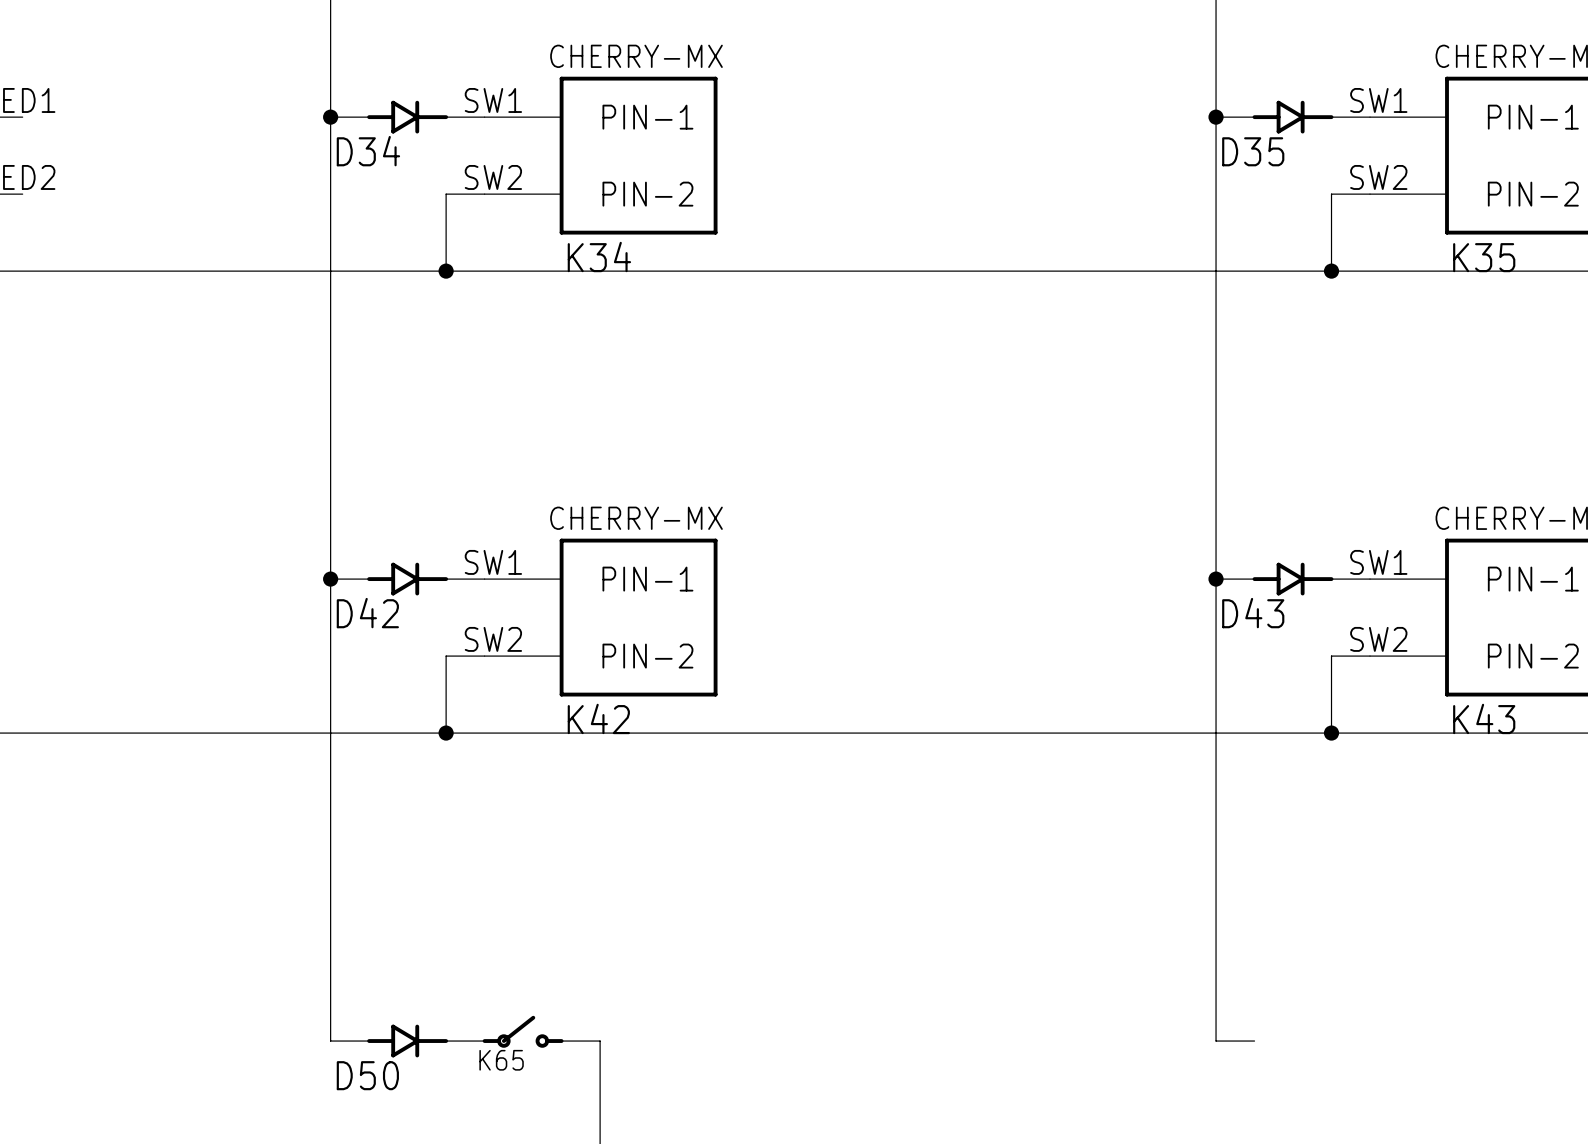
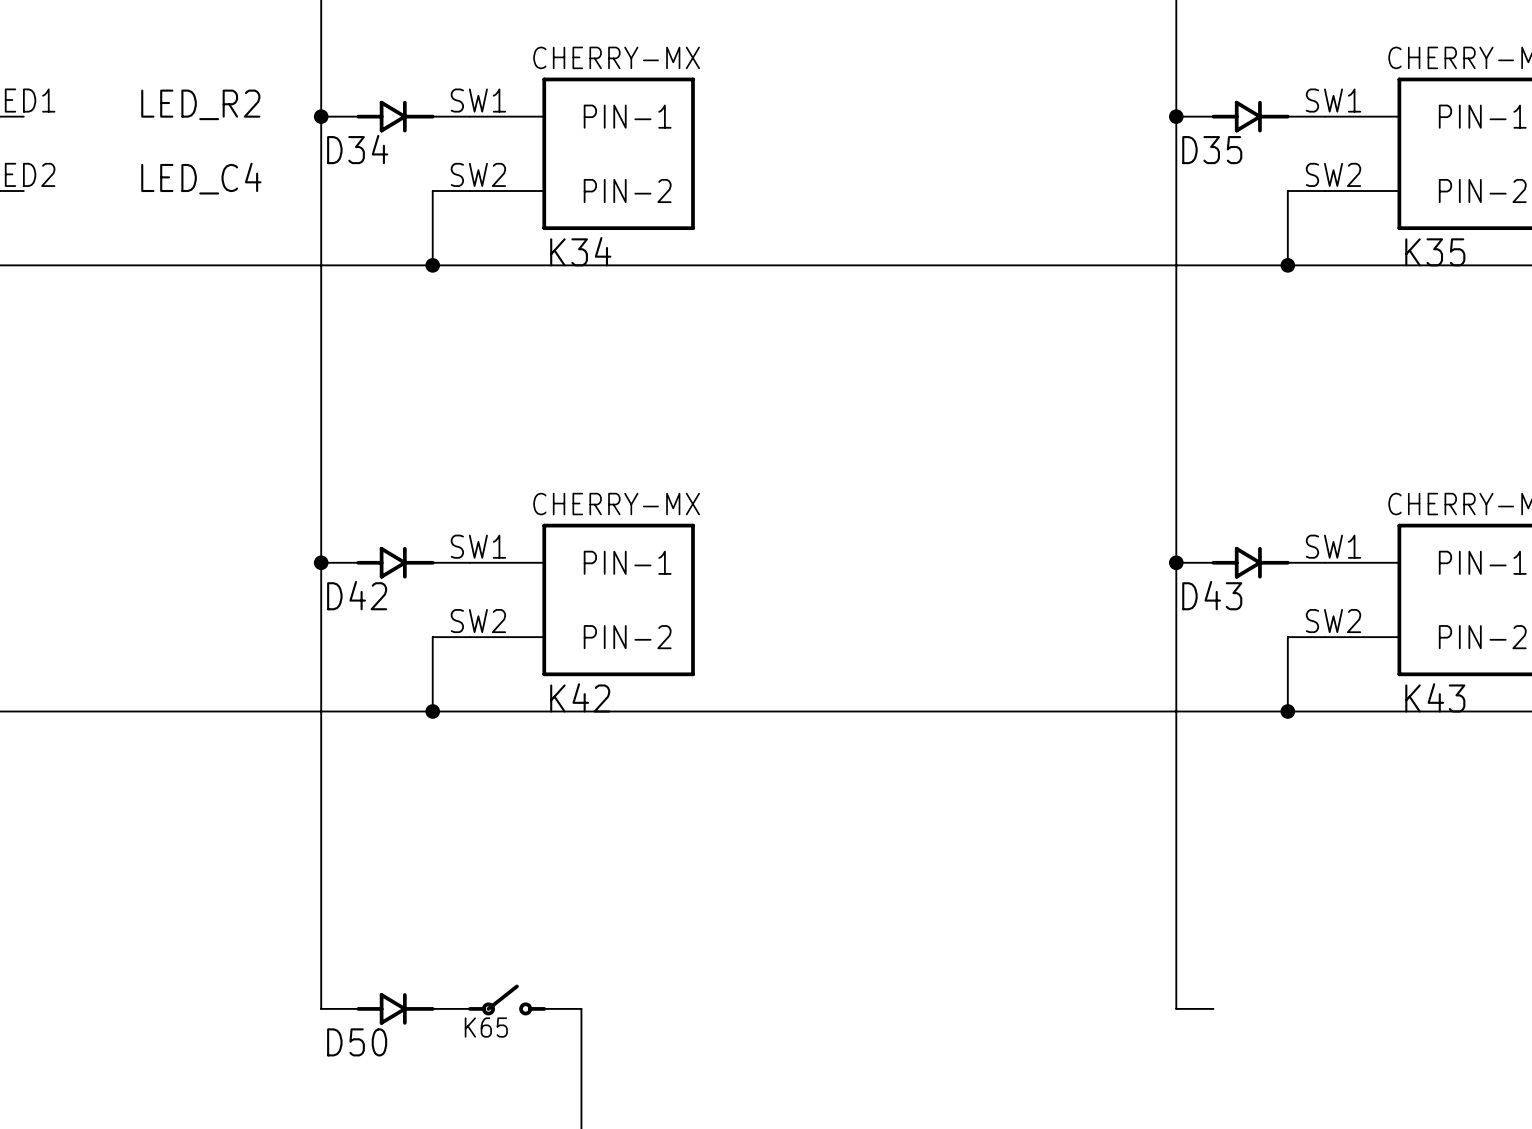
label: none -> LED_R2 (200, 104)
label: none -> LED_C4 (201, 178)

